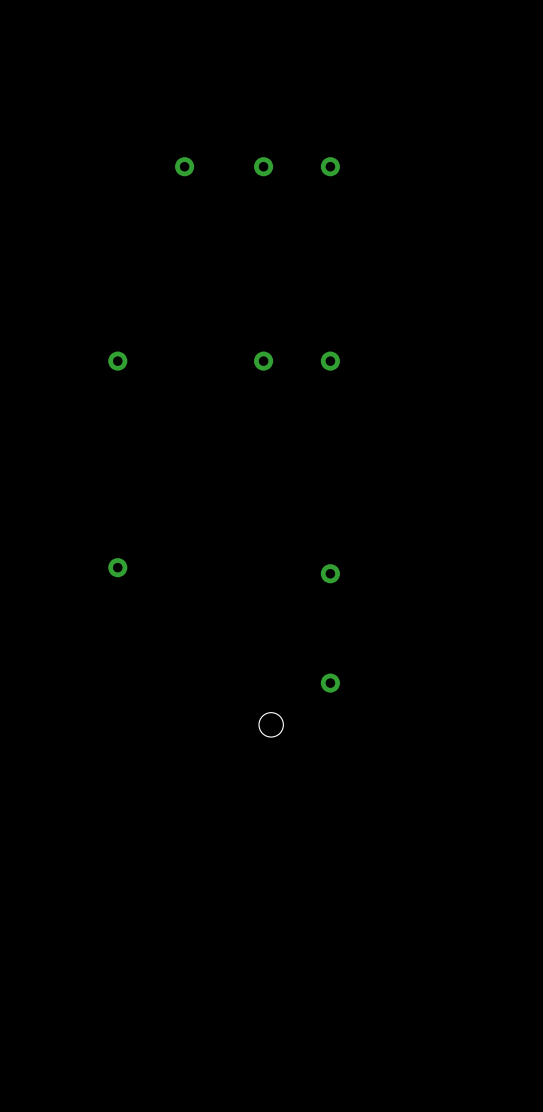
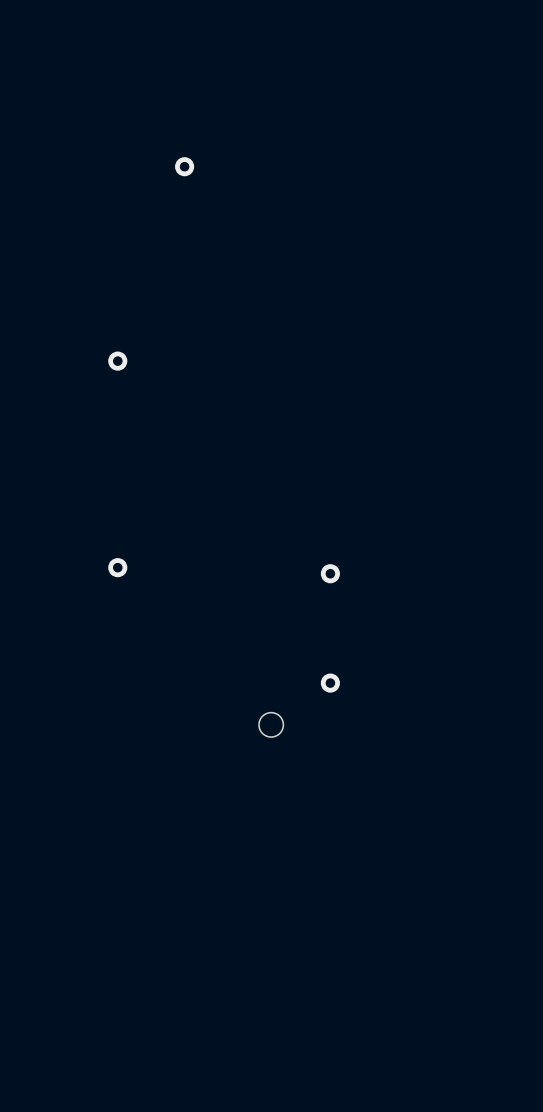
via: (263, 166) -> none
via: (330, 166) -> none
via: (263, 361) -> none
via: (330, 361) -> none

